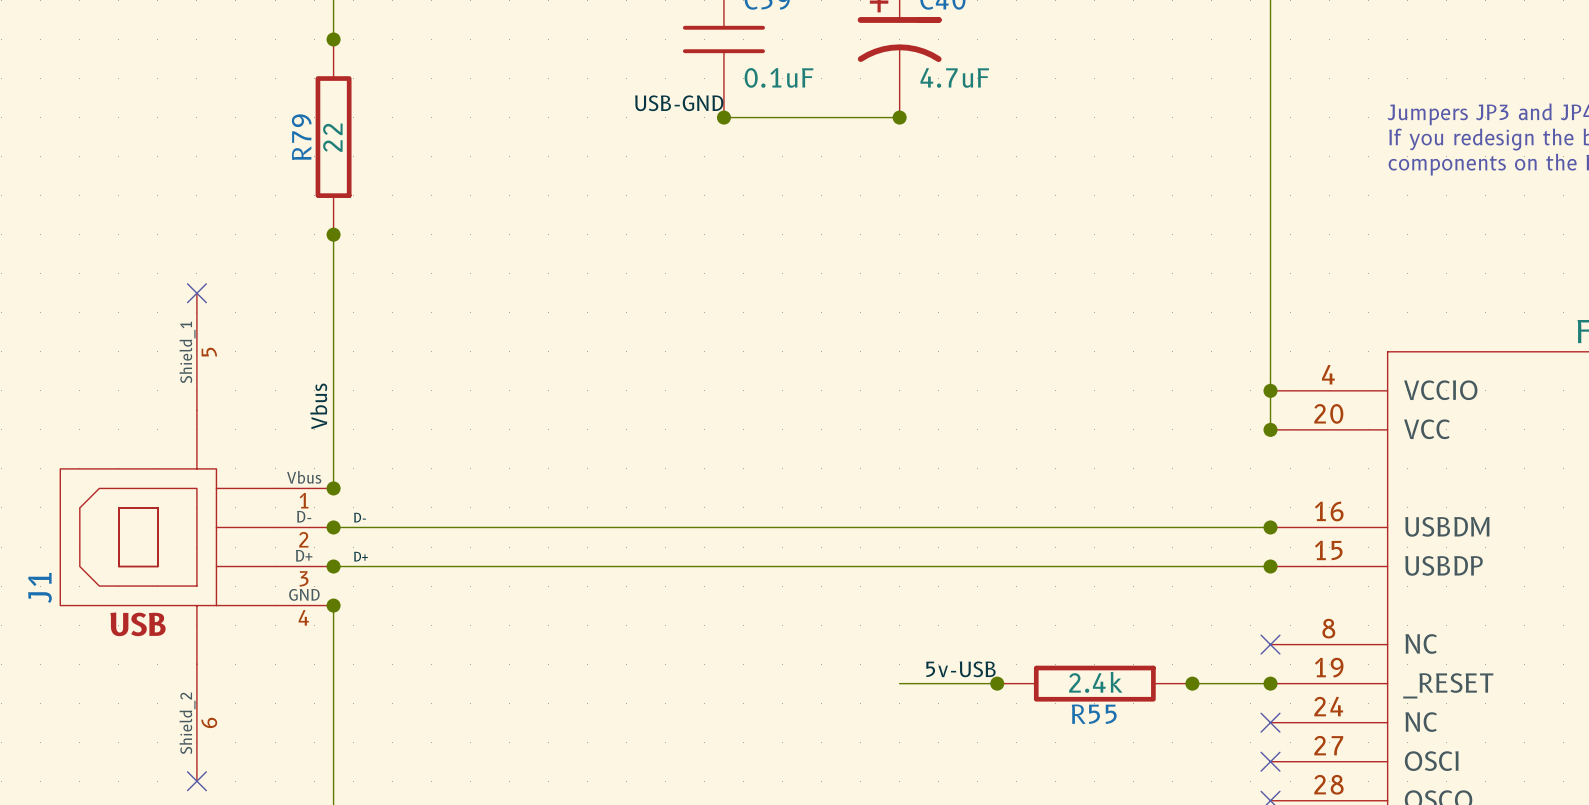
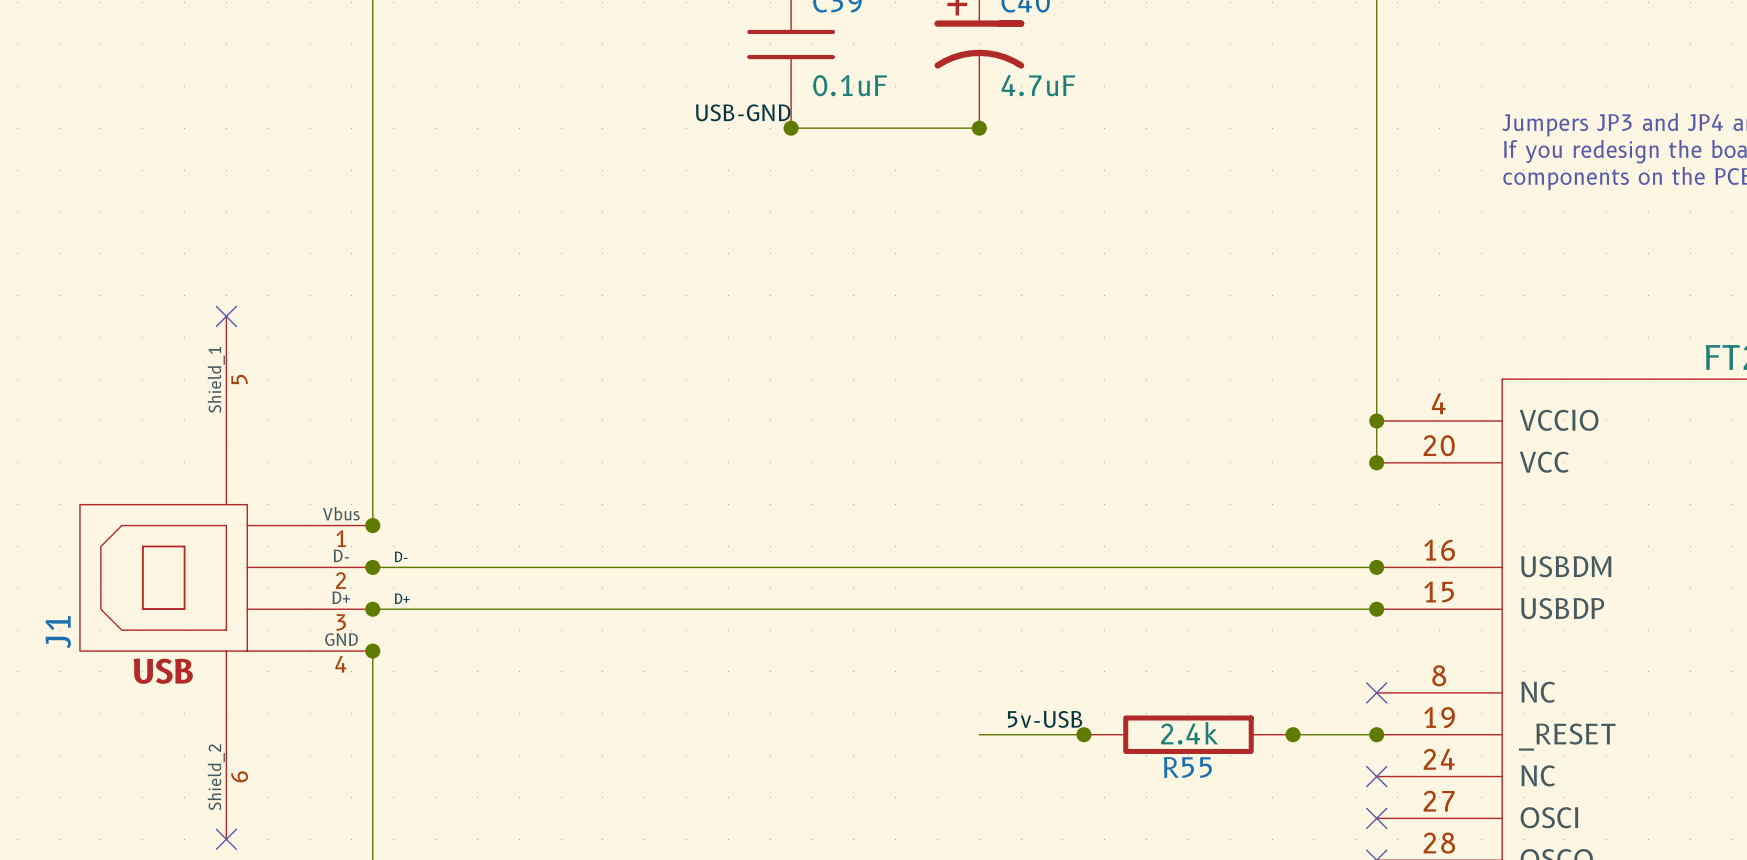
wire: none -> (372, 44) (372, 253)
junction: (333, 39) -> none
R79: 22 (333, 137) -> none
junction: (333, 234) -> none
label: Vbus (318, 406) -> none

